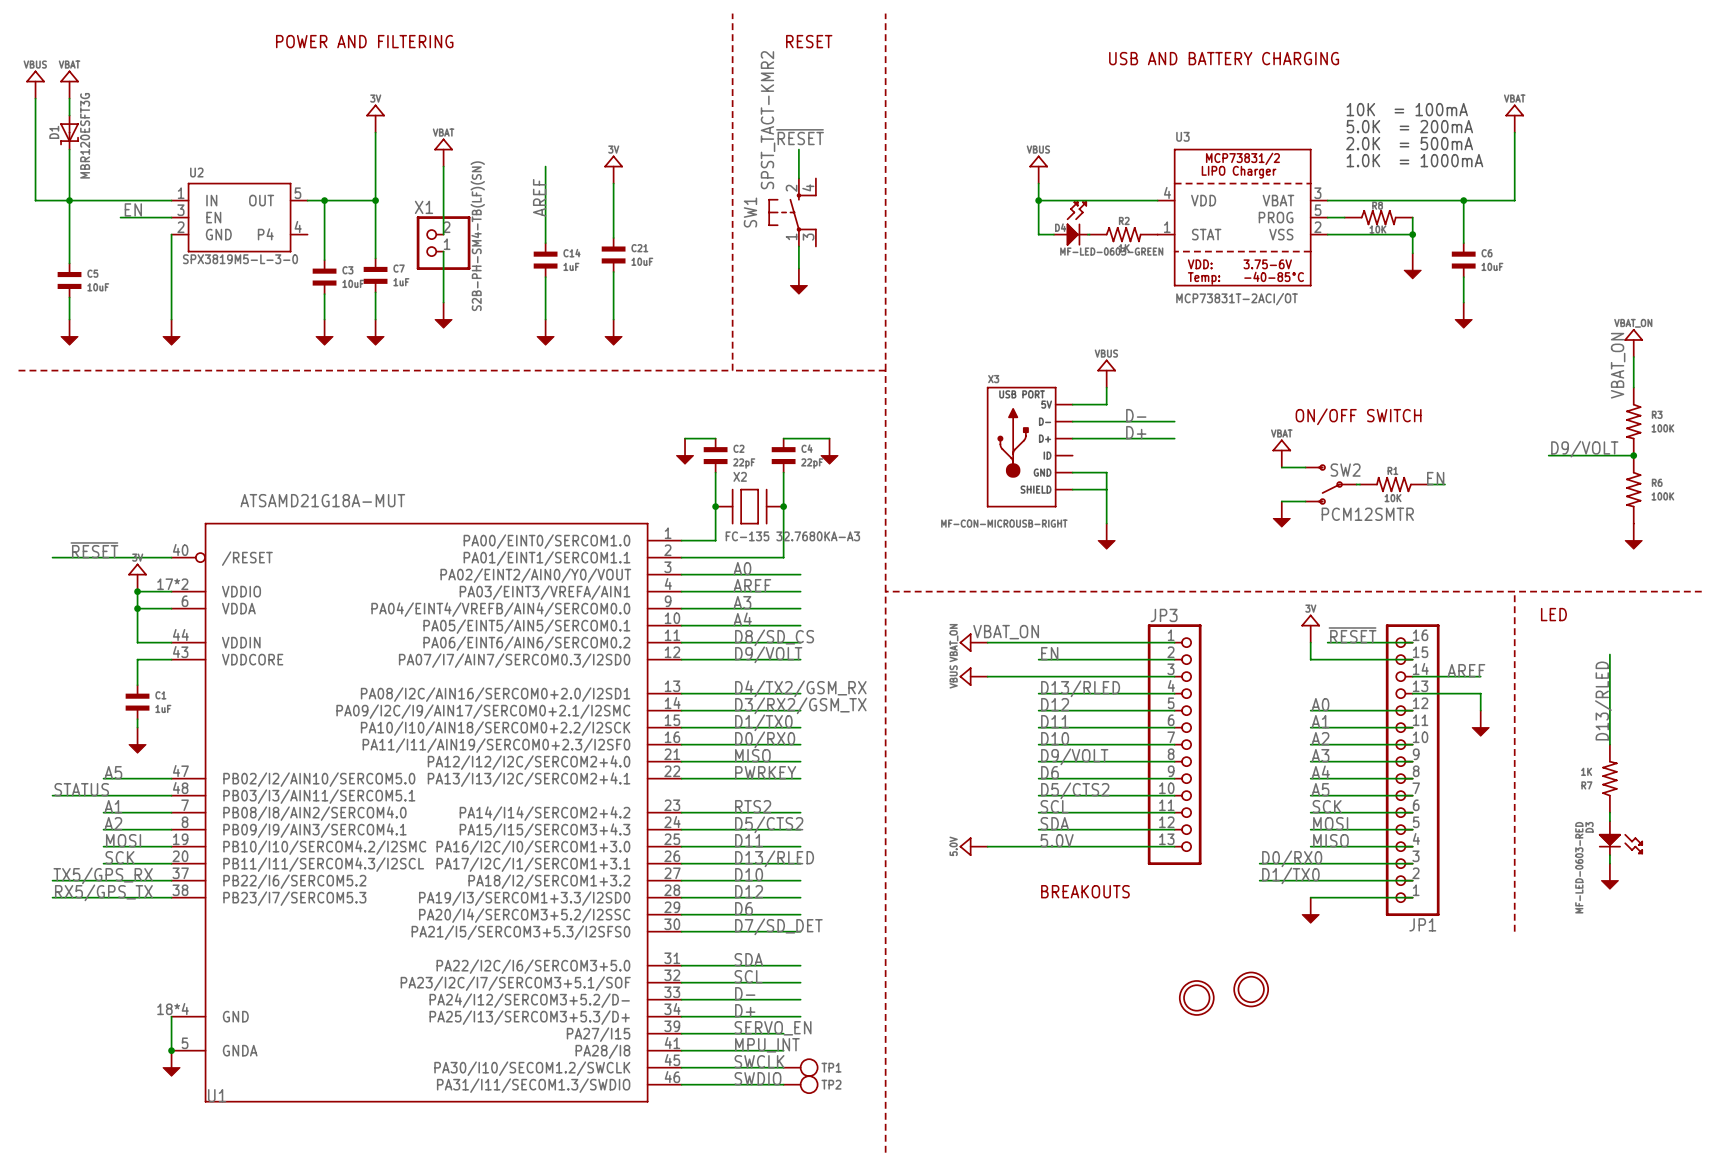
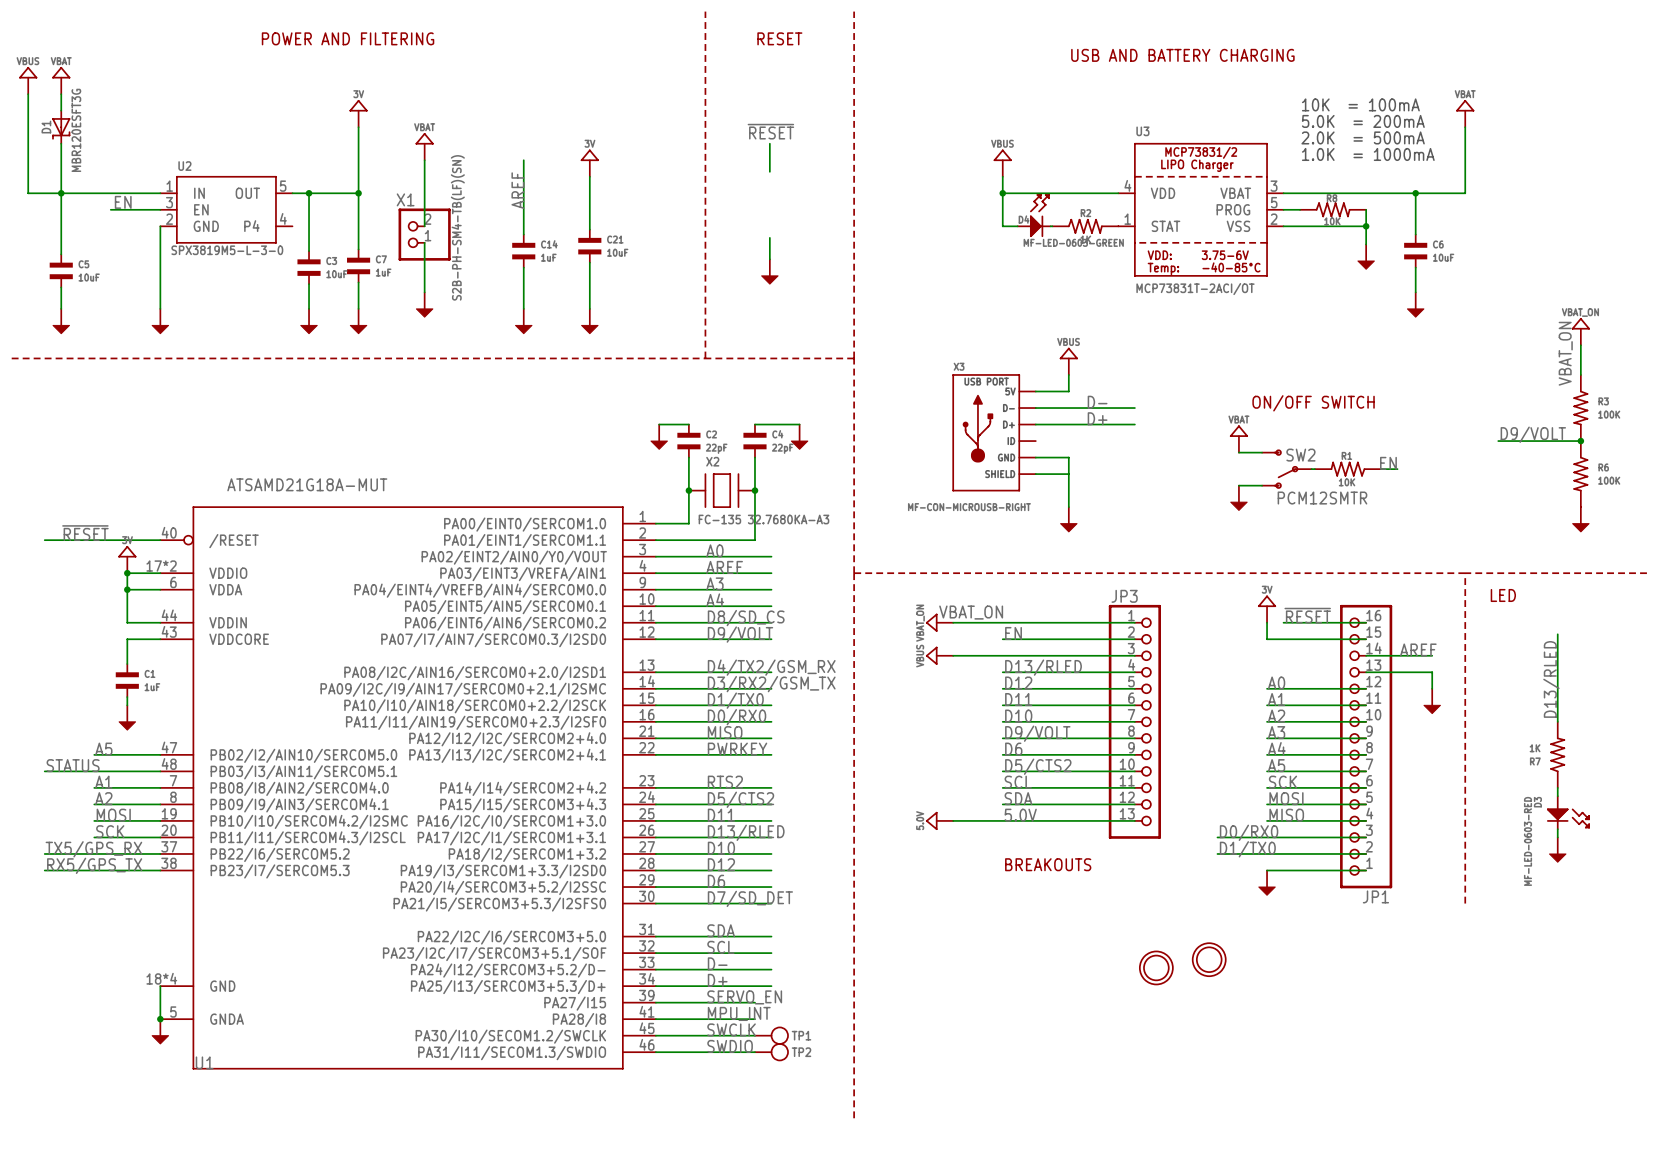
SW1: SPST_TACT-KMR2 (792, 212) -> none

